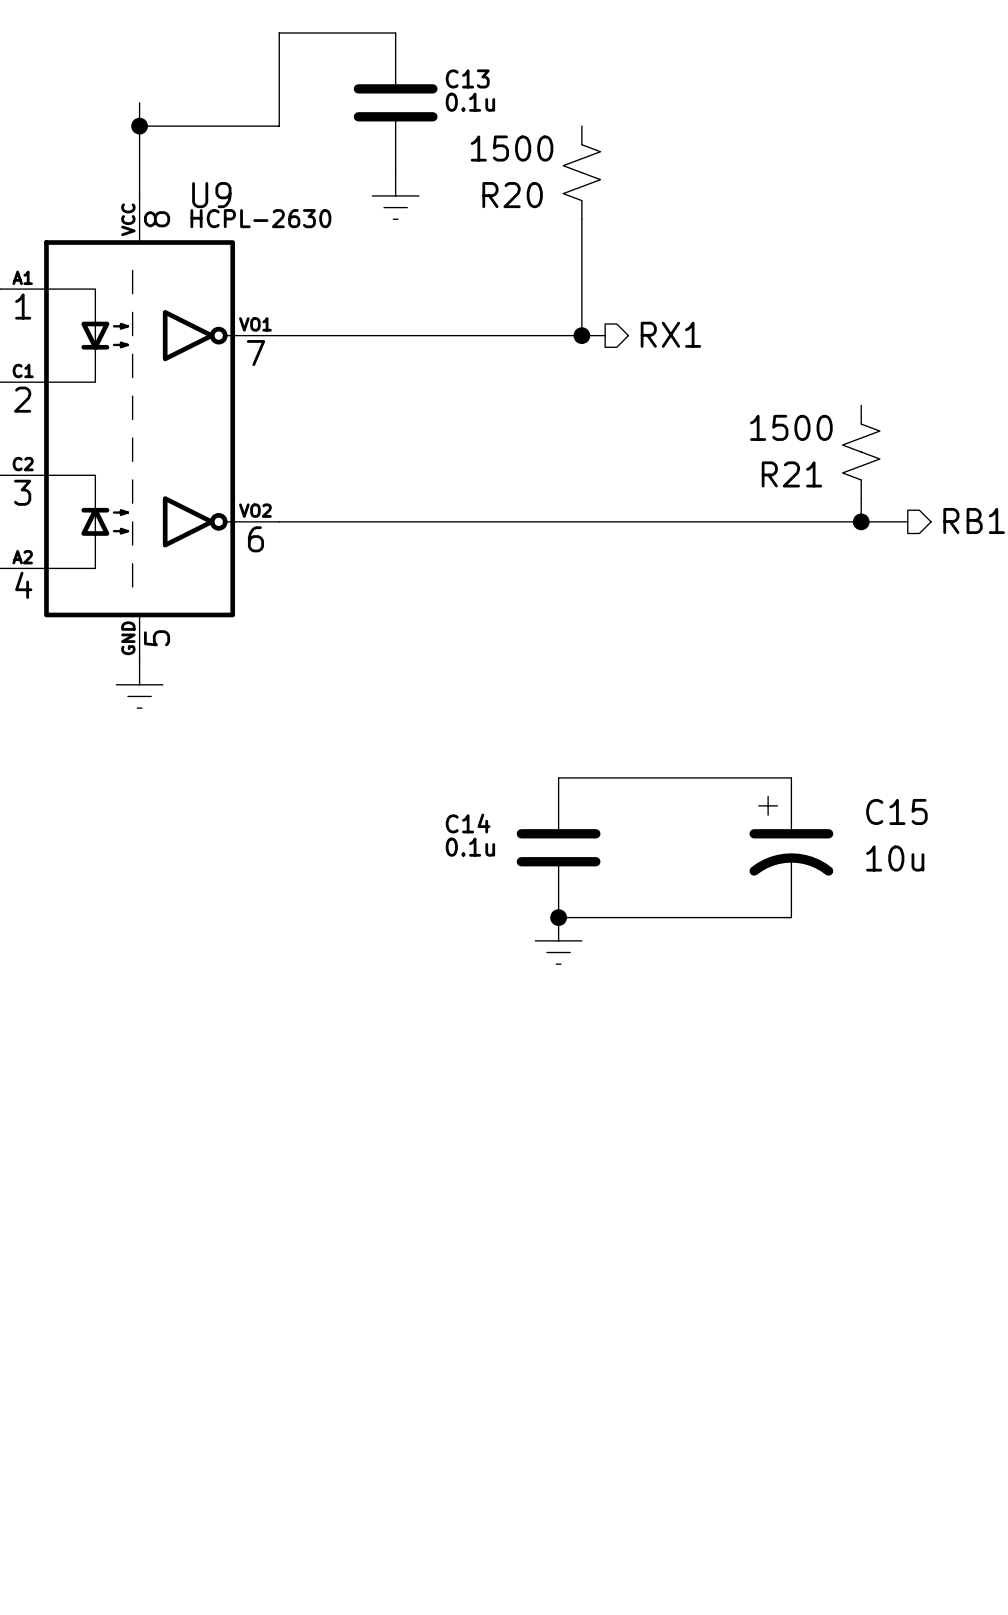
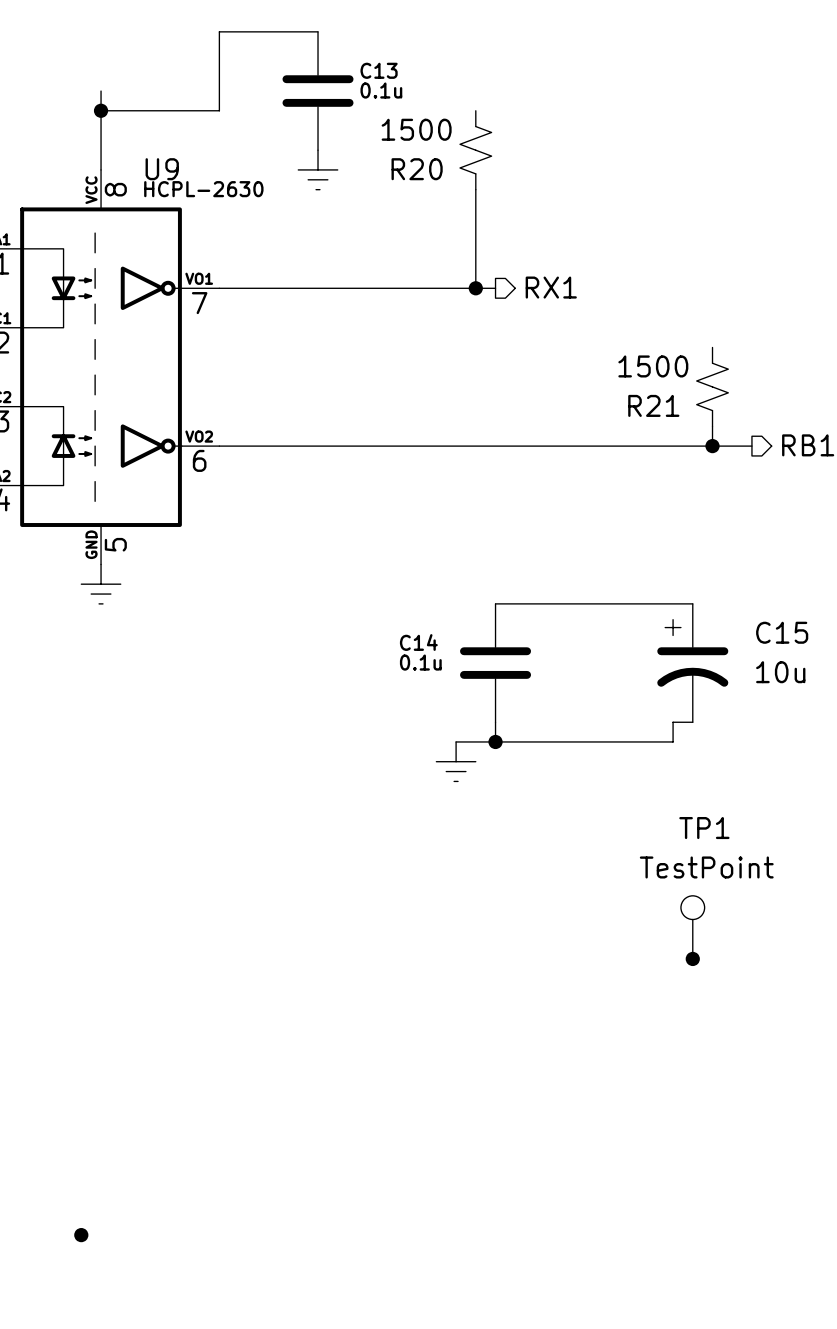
wire: (558, 777) (791, 777) -> (495, 603) (692, 603)
C14 position: (558, 847) -> (495, 663)
wire: none -> (495, 722) (495, 741)
C15 position: (791, 847) -> (692, 663)
wire: none -> (692, 722) (673, 722) (673, 741) (456, 741)
wire: (558, 917) (791, 917) -> none
junction position: (558, 917) -> (495, 741)
power symbol position: (558, 940) -> (456, 761)
TP1: none -> TestPoint (692, 927)
junction: none -> (692, 958)
junction: none -> (81, 1235)

